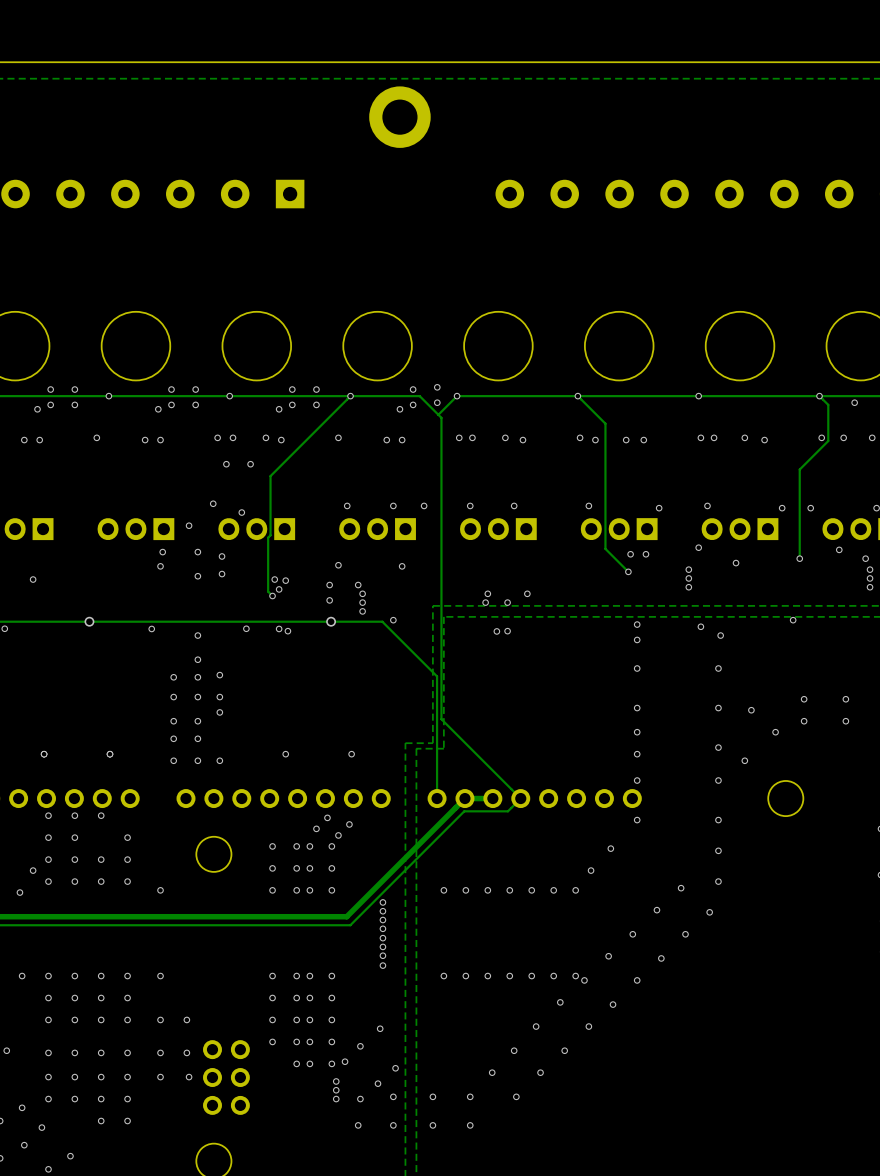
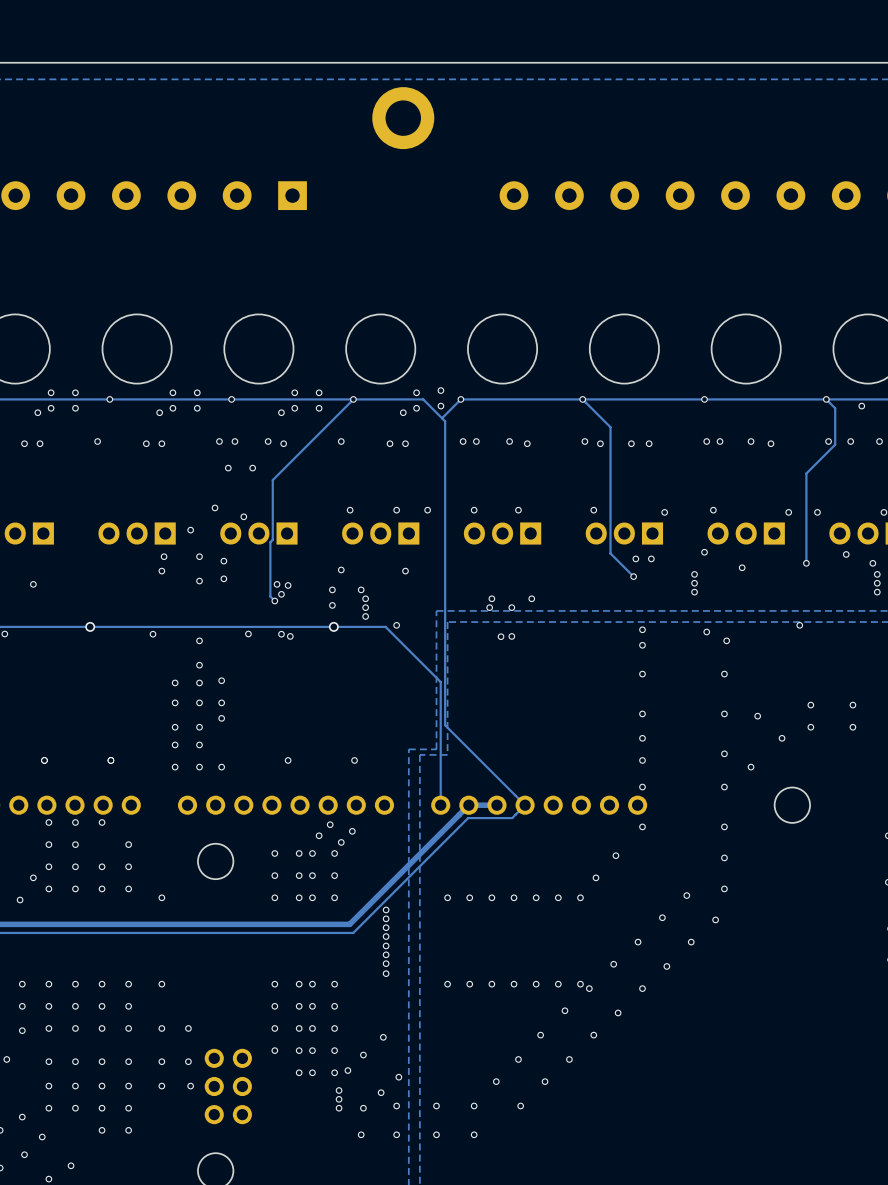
via: none -> (22, 1006)
via: none -> (22, 1030)

